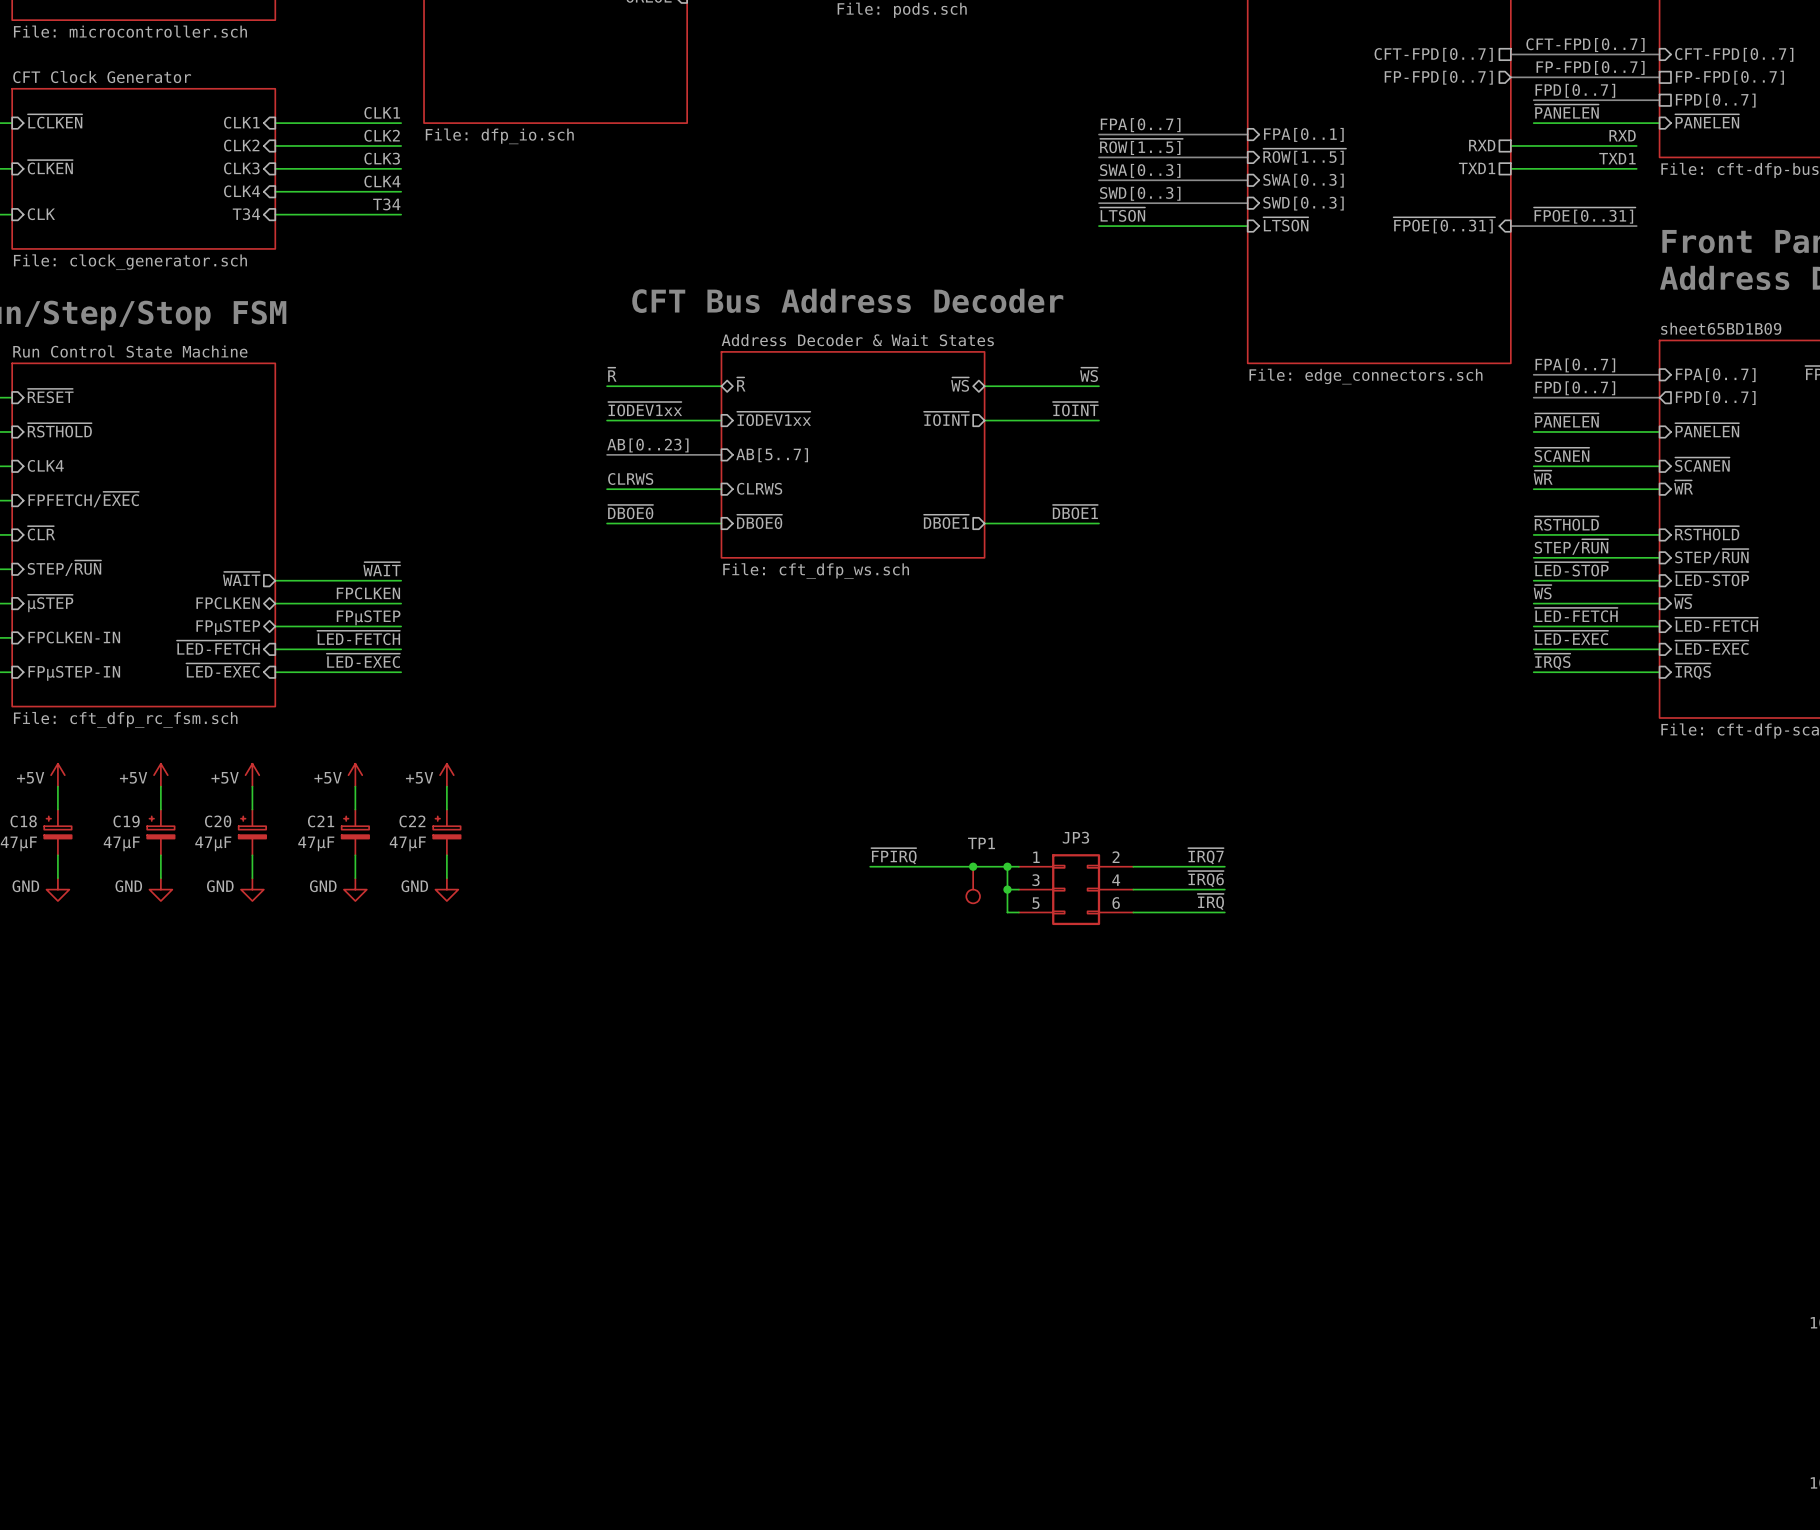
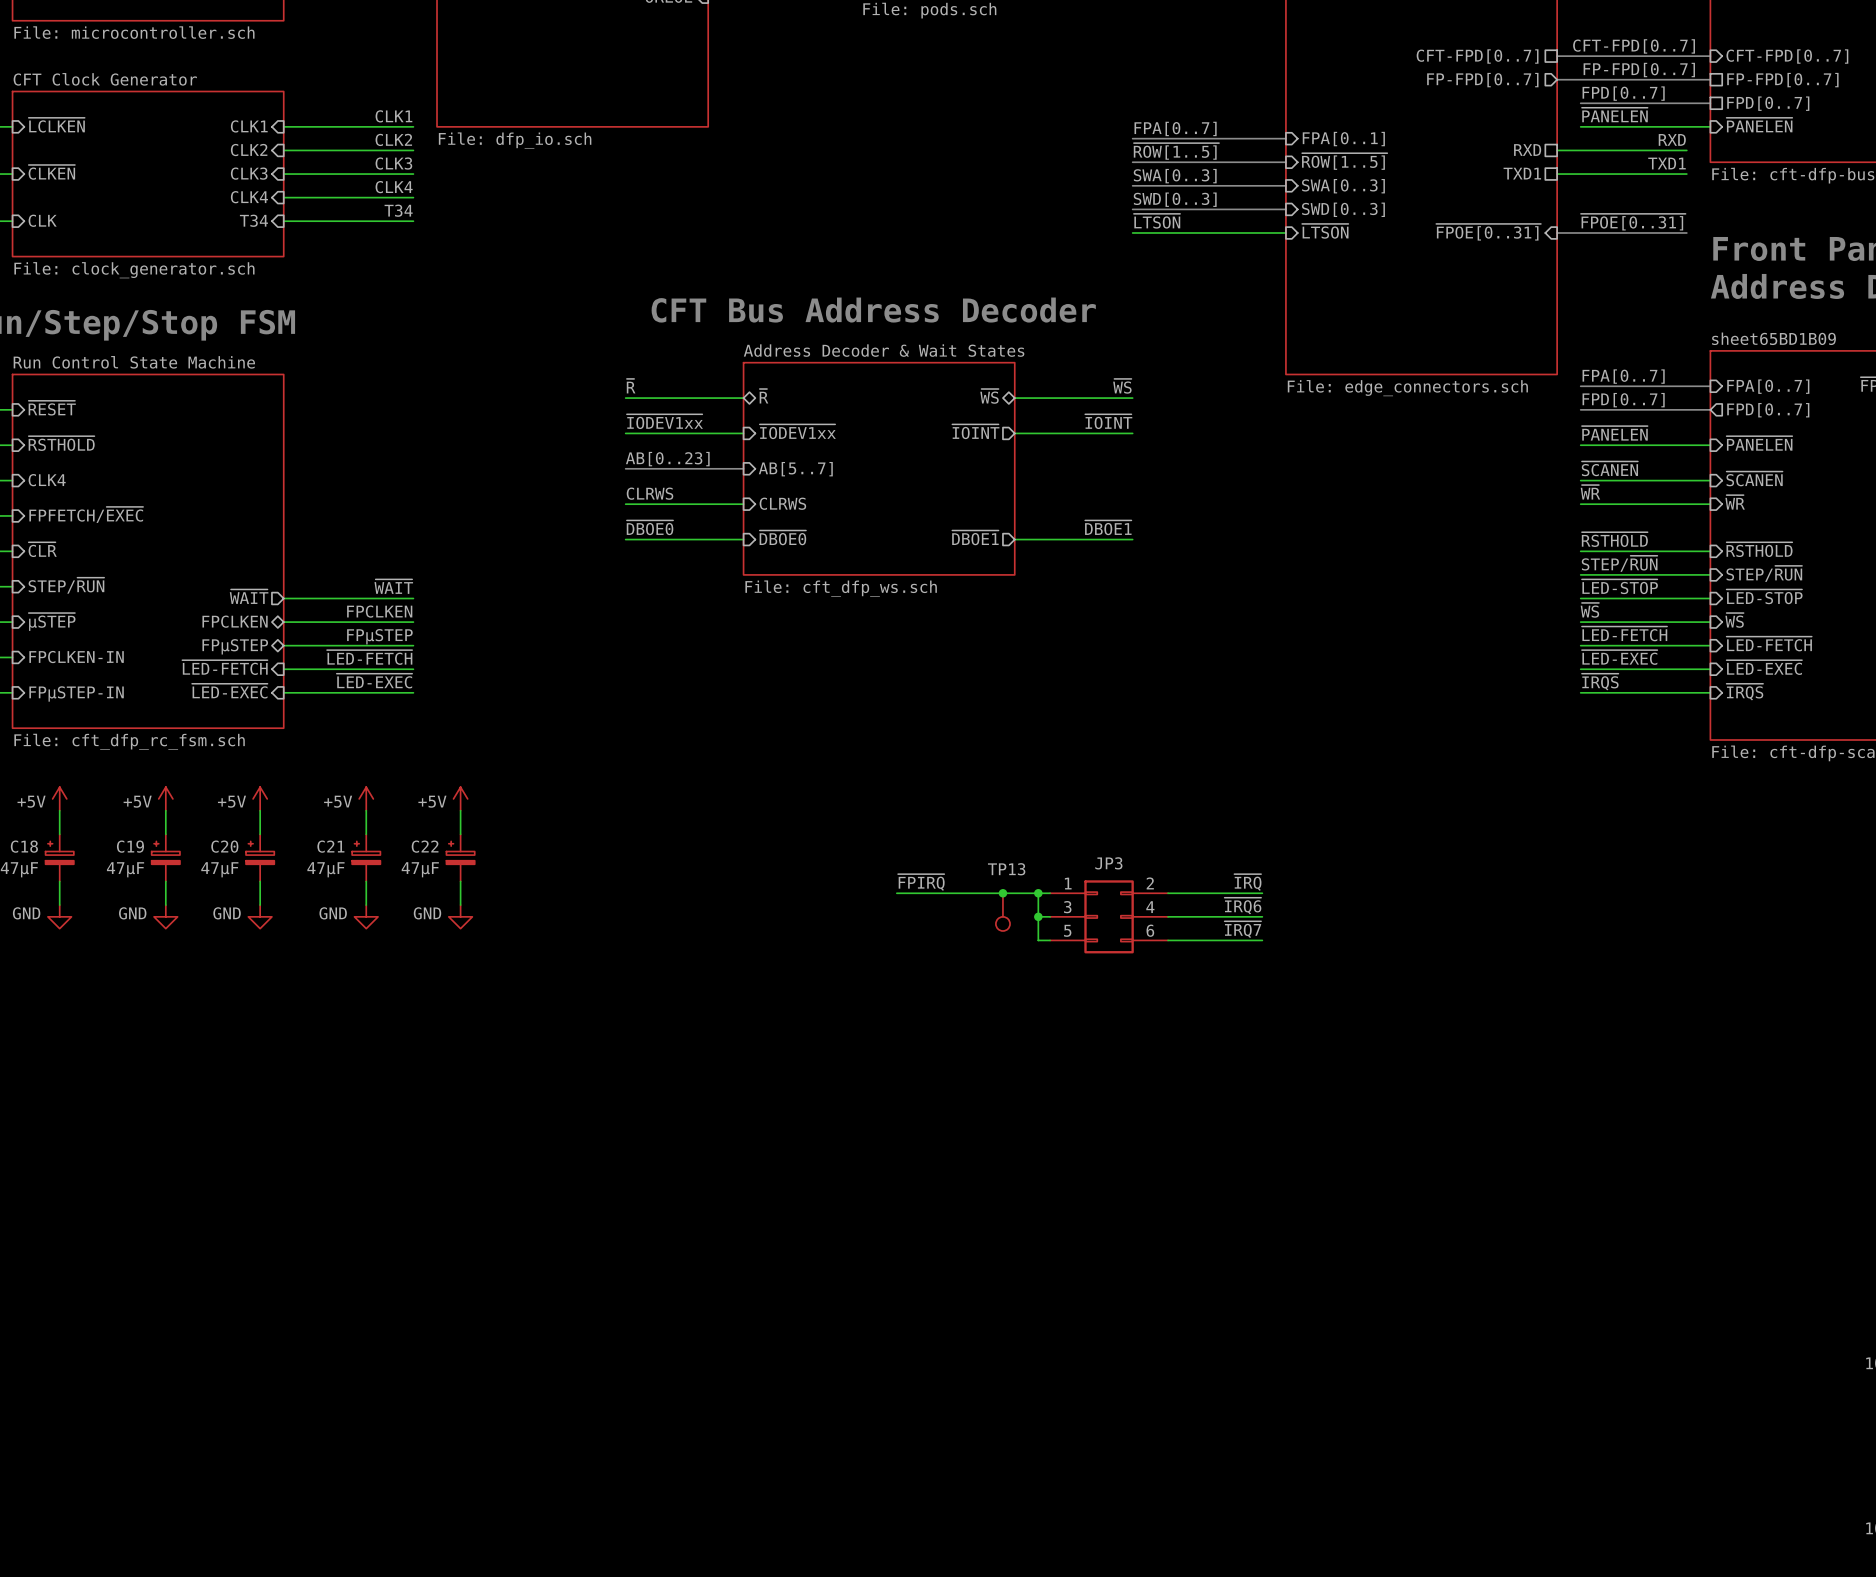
TP1 name: TP1 (981, 843) -> TP13 (1006, 869)
label: ~{IRQ7} (1205, 856) -> ~{IRQ} (1247, 882)
label: ~{IRQ} (1210, 901) -> ~{IRQ7} (1242, 929)

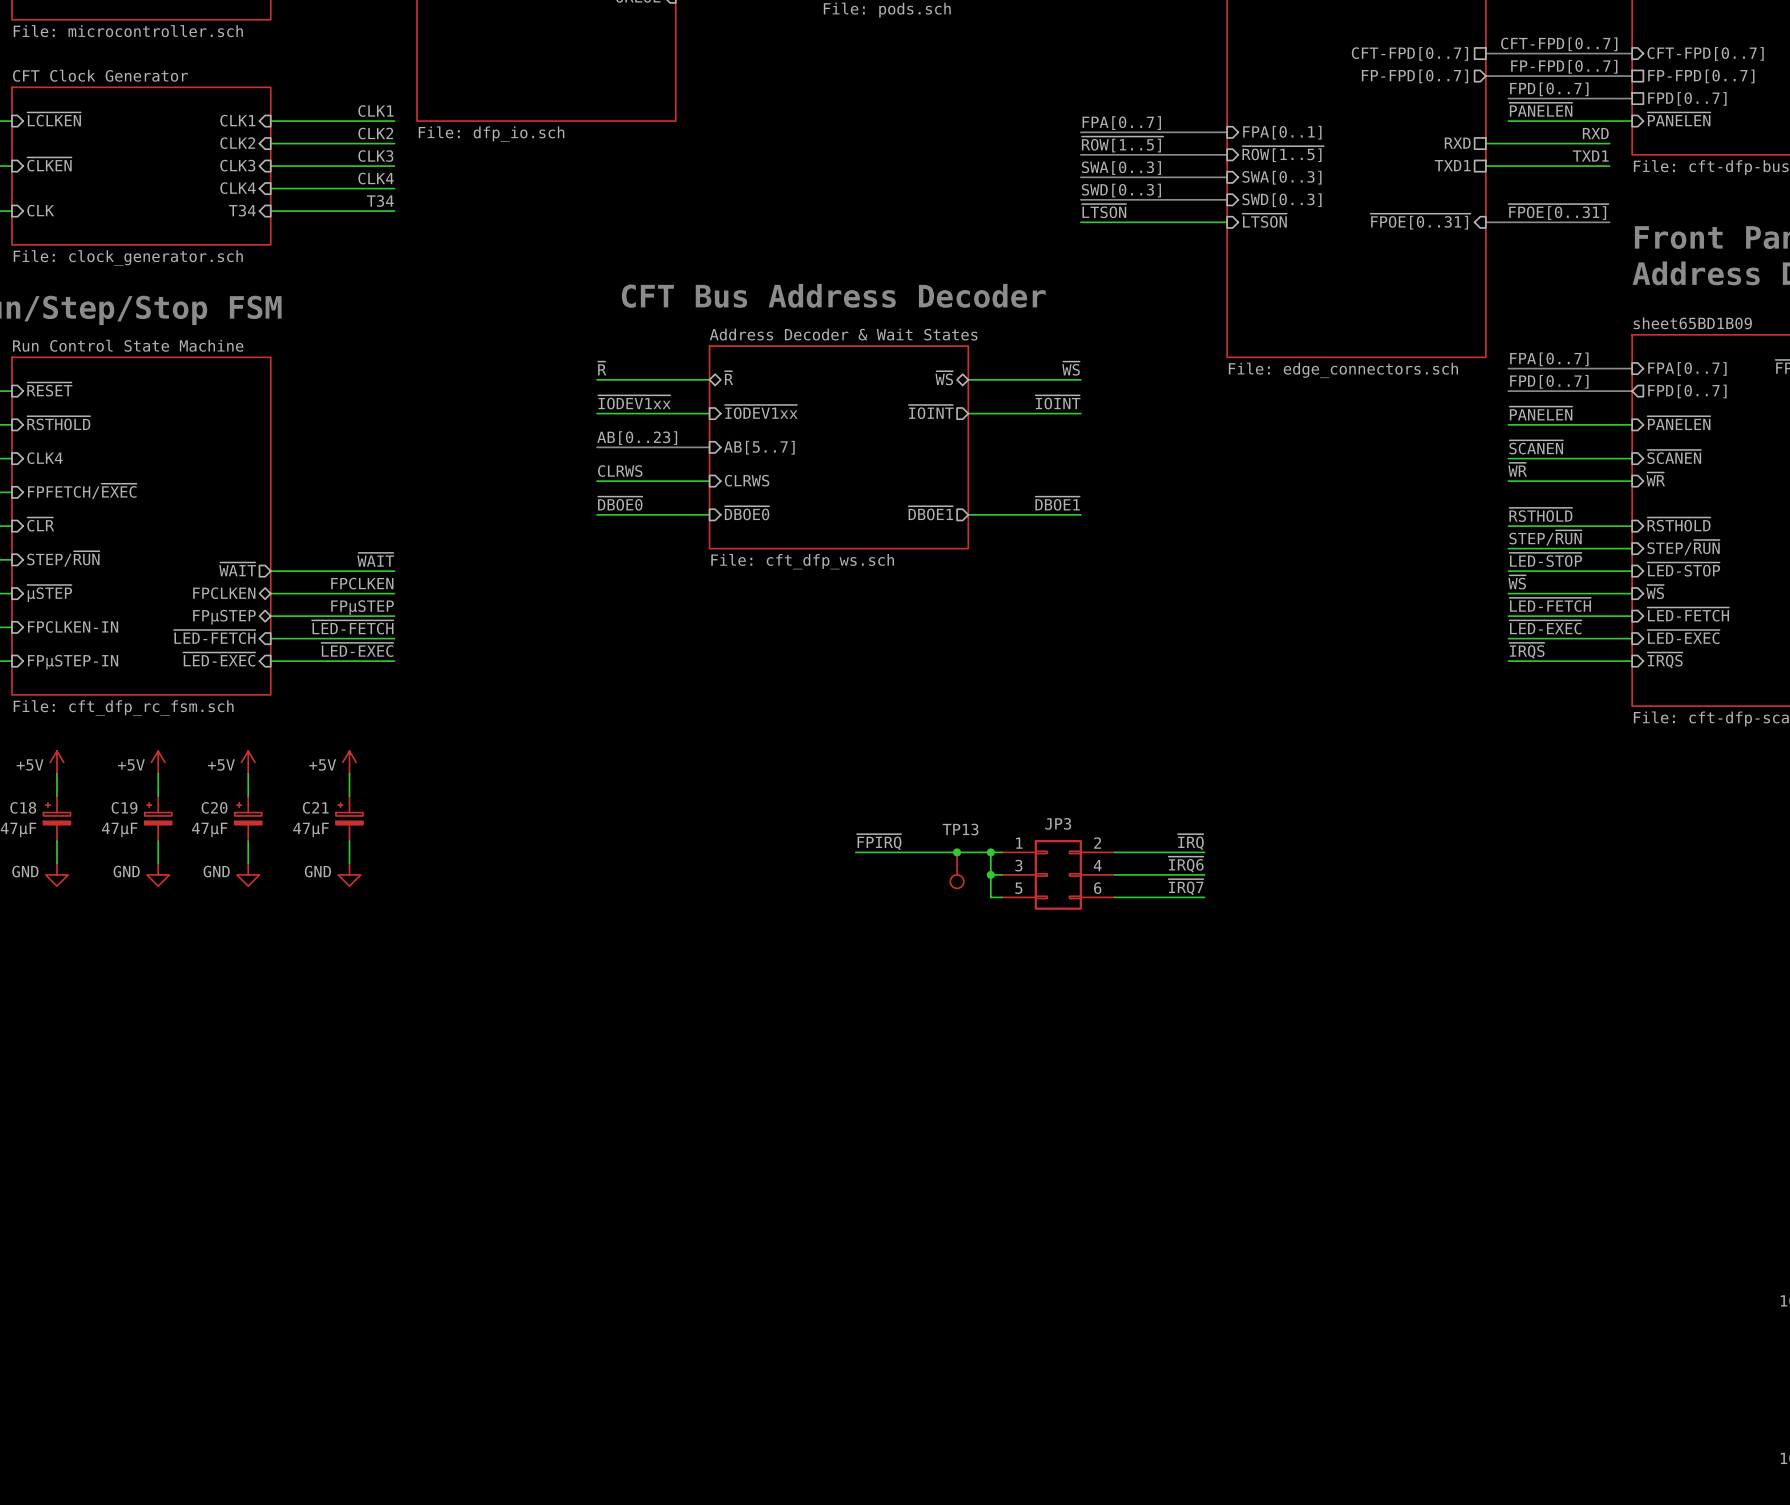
power symbol: +5V (460, 798) -> none
wire: (460, 810) (460, 834) -> none
C22: 47µF (460, 857) -> none
wire: (460, 881) (460, 905) -> none
power symbol: GND (460, 916) -> none

